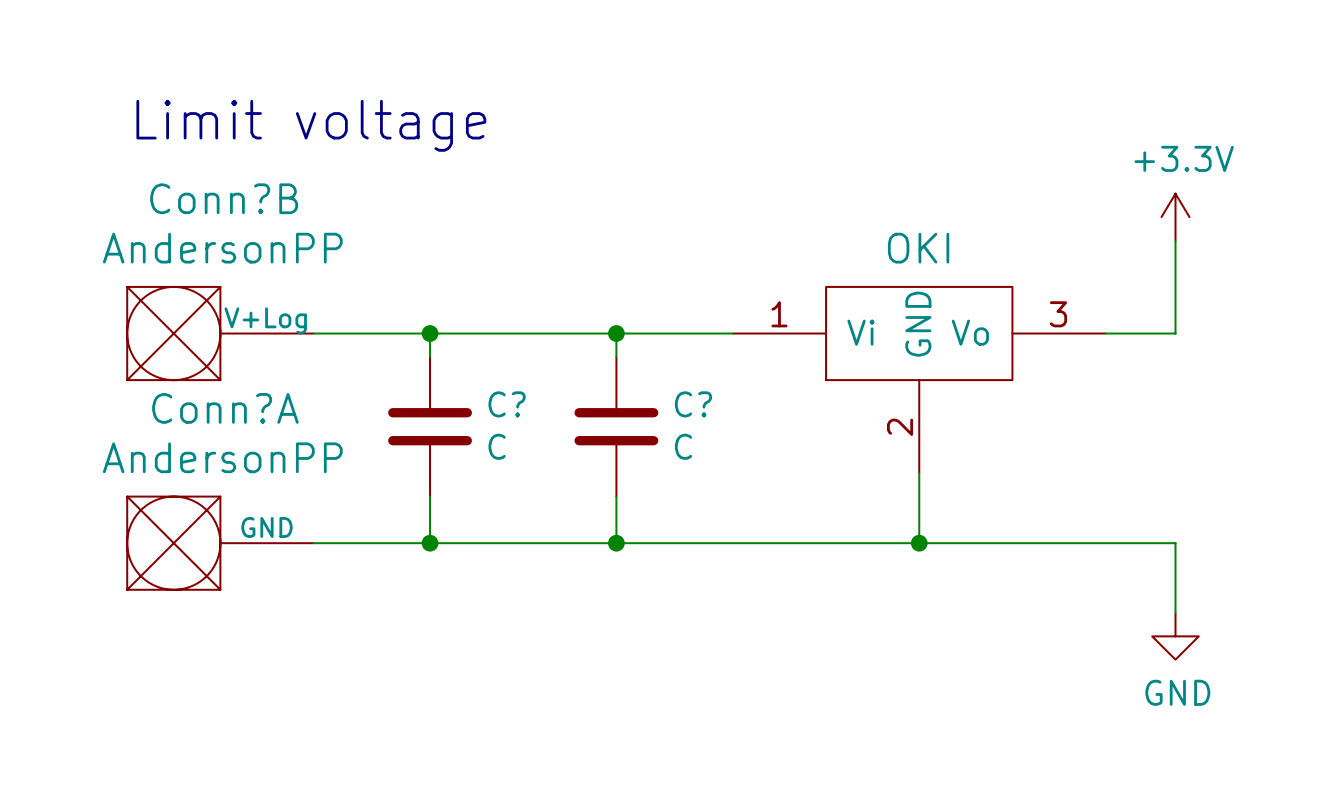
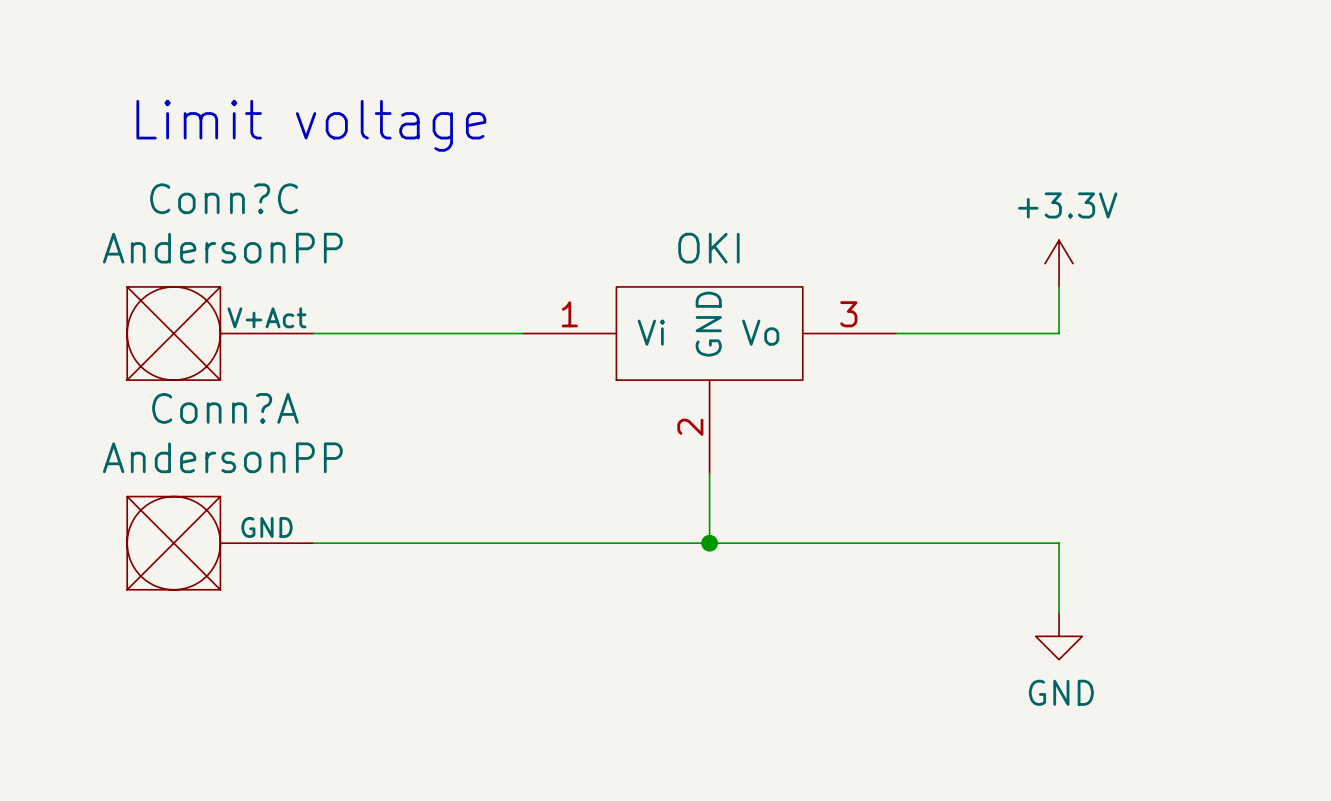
Conn?B name: Conn?B (224, 198) -> Conn?C (224, 198)
power symbol position: +3.3V (1175, 217) -> +3.3V (1059, 263)
wire: (1175, 240) (1175, 333) (1105, 333) -> none
wire: none -> (1059, 286) (1059, 333) (895, 333)
Conn?B pin name: V+Log (265, 320) -> V+Act (266, 317)
wire: (430, 333) (430, 356) -> none
junction: (430, 333) -> none
wire: (523, 333) (732, 333) -> none
junction: (616, 333) -> none
part position: (919, 380) -> (709, 380)
C?: C (430, 426) -> none
C?: C (616, 426) -> none
wire: (919, 473) (919, 543) -> (709, 473) (709, 543)
wire: (430, 496) (430, 543) -> none
wire: (616, 496) (616, 543) -> none
junction: (430, 543) -> none
junction position: (616, 543) -> (709, 543)
junction: (919, 543) -> none
wire: (1059, 543) (1175, 543) (1175, 613) -> (1059, 543) (1059, 613)
power symbol position: GND (1175, 636) -> GND (1059, 636)

